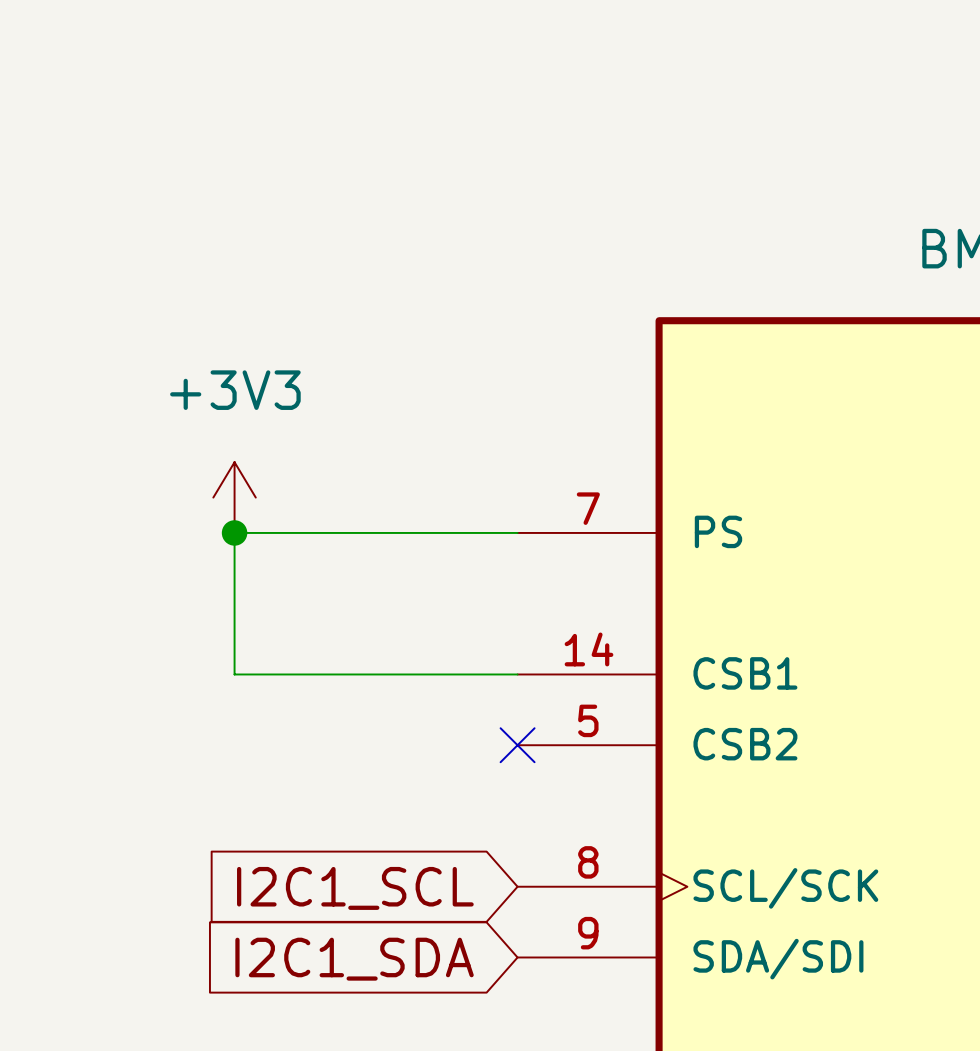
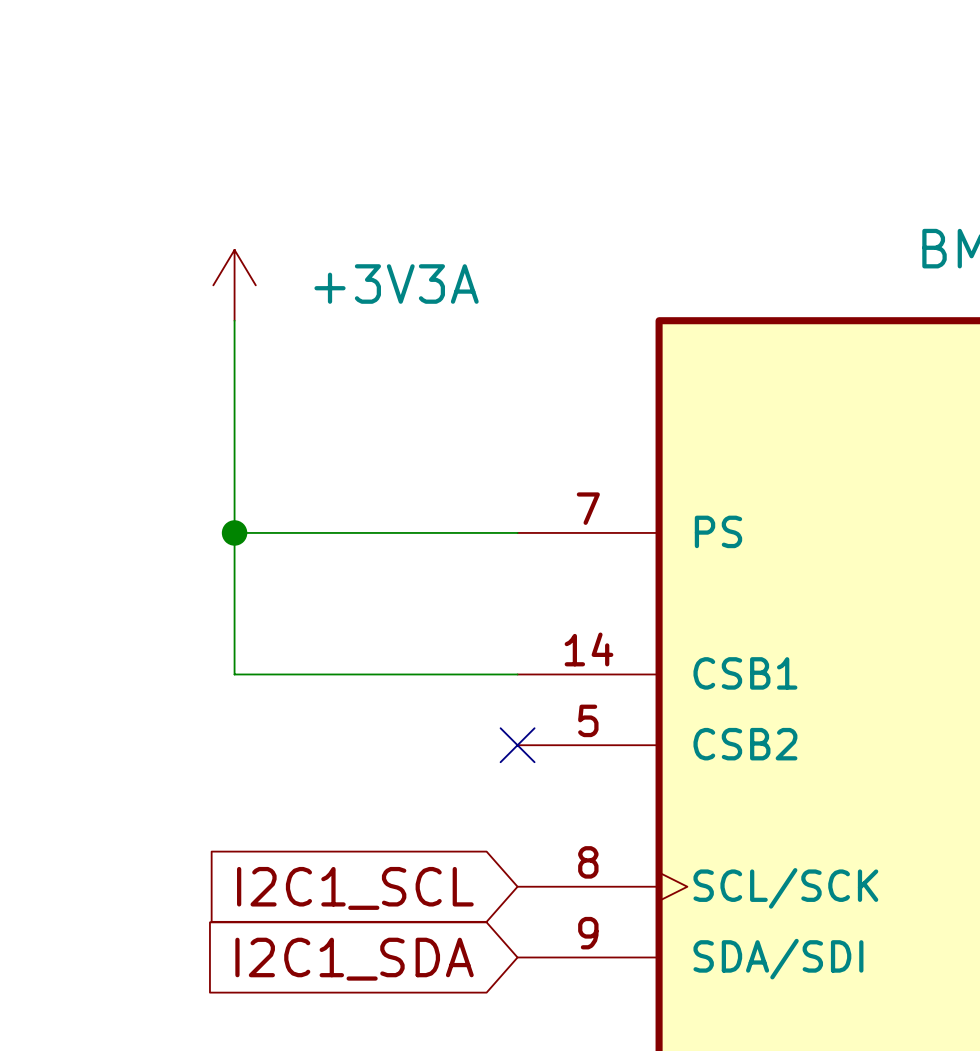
power symbol: none -> +3V3A (234, 285)
wire: none -> (234, 320) (234, 532)
power symbol: +3V3 (234, 497) -> none

